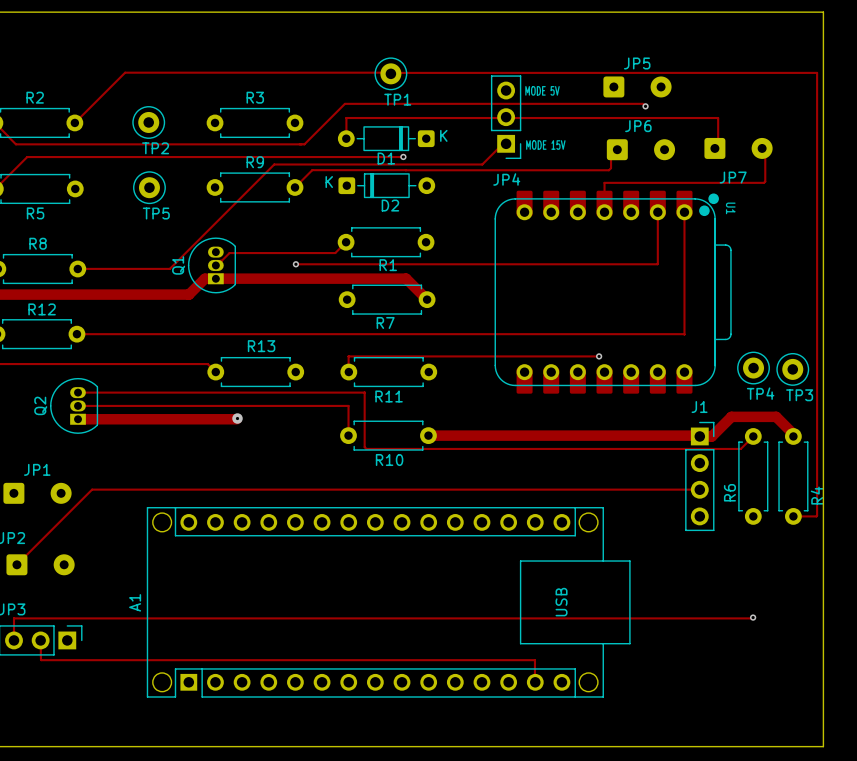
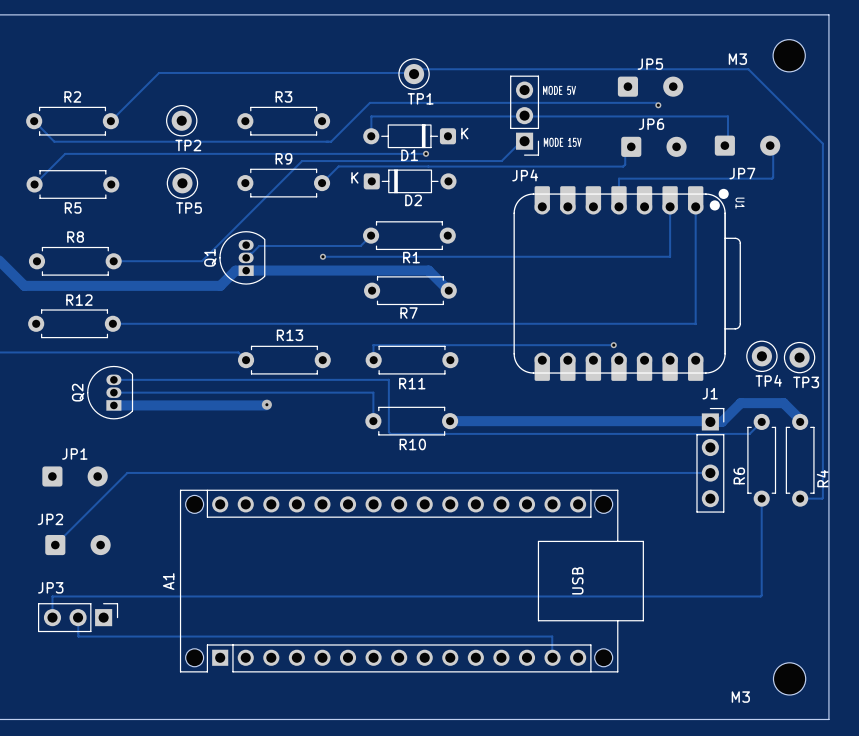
M3: none -> (789, 55)
track: (391, 72) (817, 72) (817, 146) -> (415, 72) (418, 69) (748, 69) (822, 143)
track: none -> (761, 498) (761, 595)
via: (753, 617) -> none
M3: none -> (789, 678)

